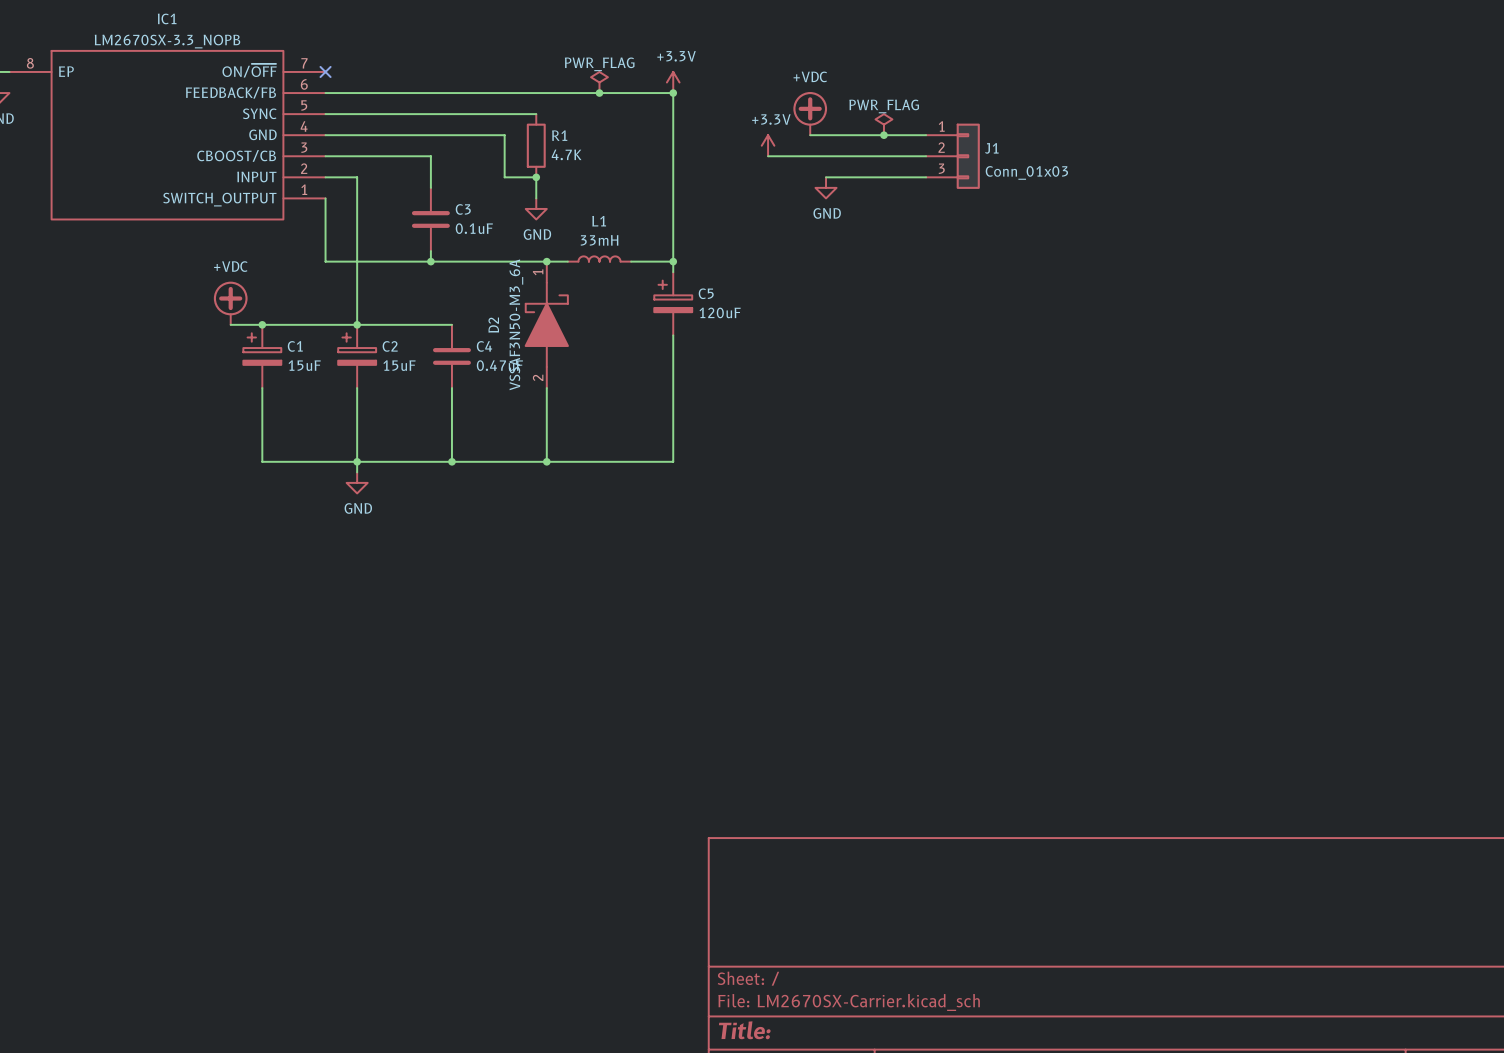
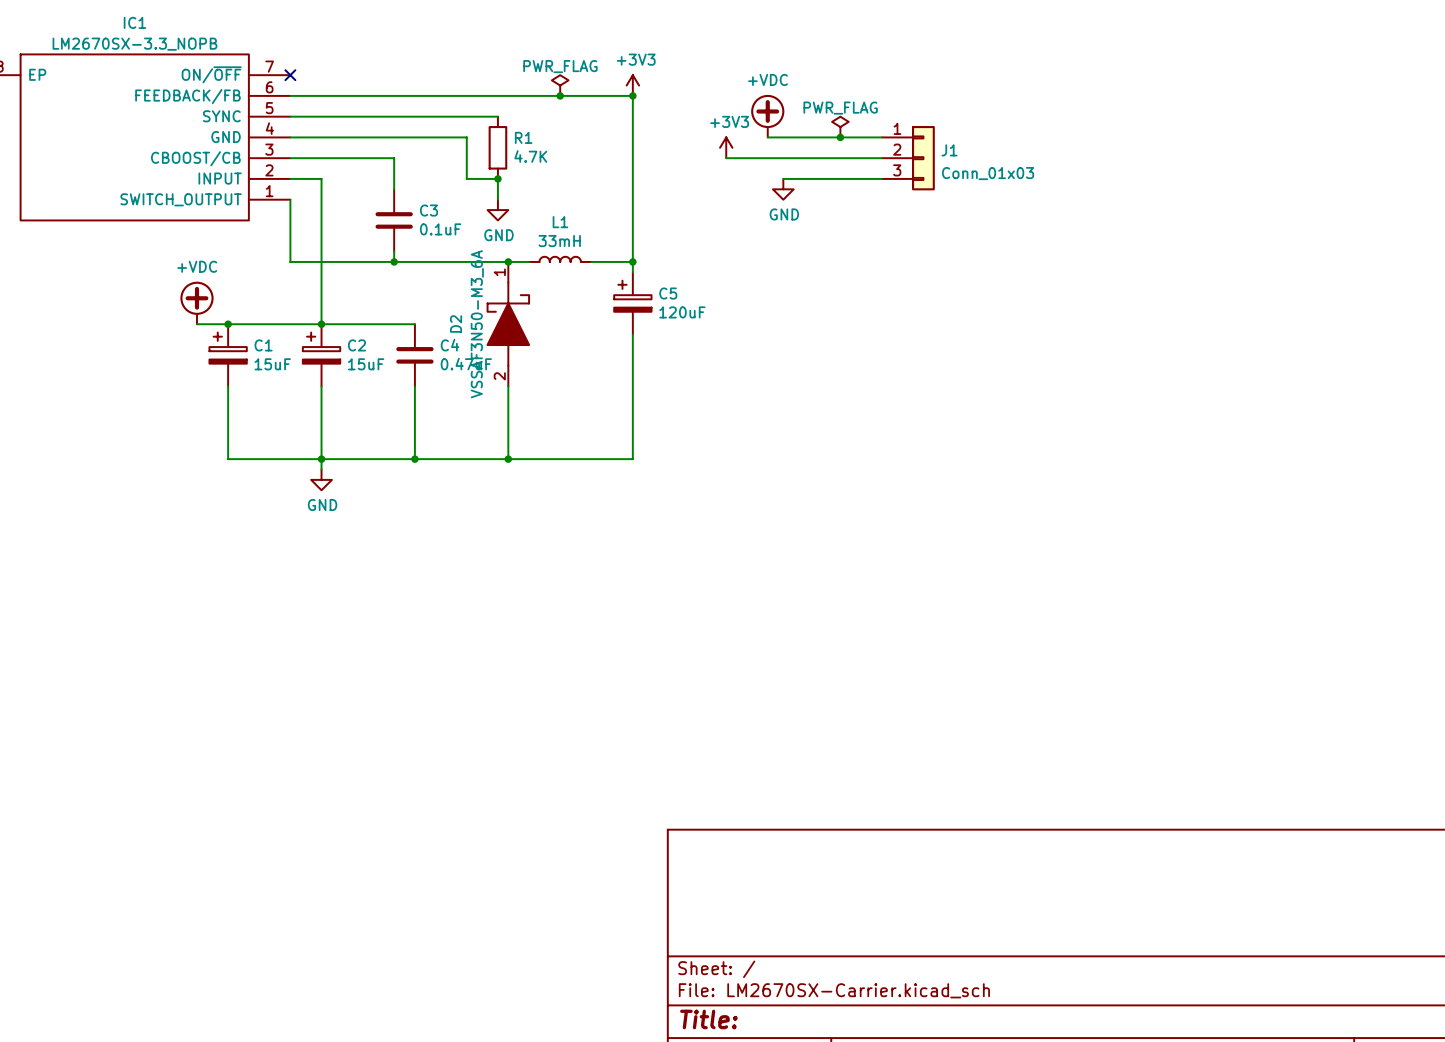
power symbol: +3.3V (673, 82) -> +3V3 (632, 85)
power symbol: +3.3V (768, 145) -> +3V3 (726, 147)

